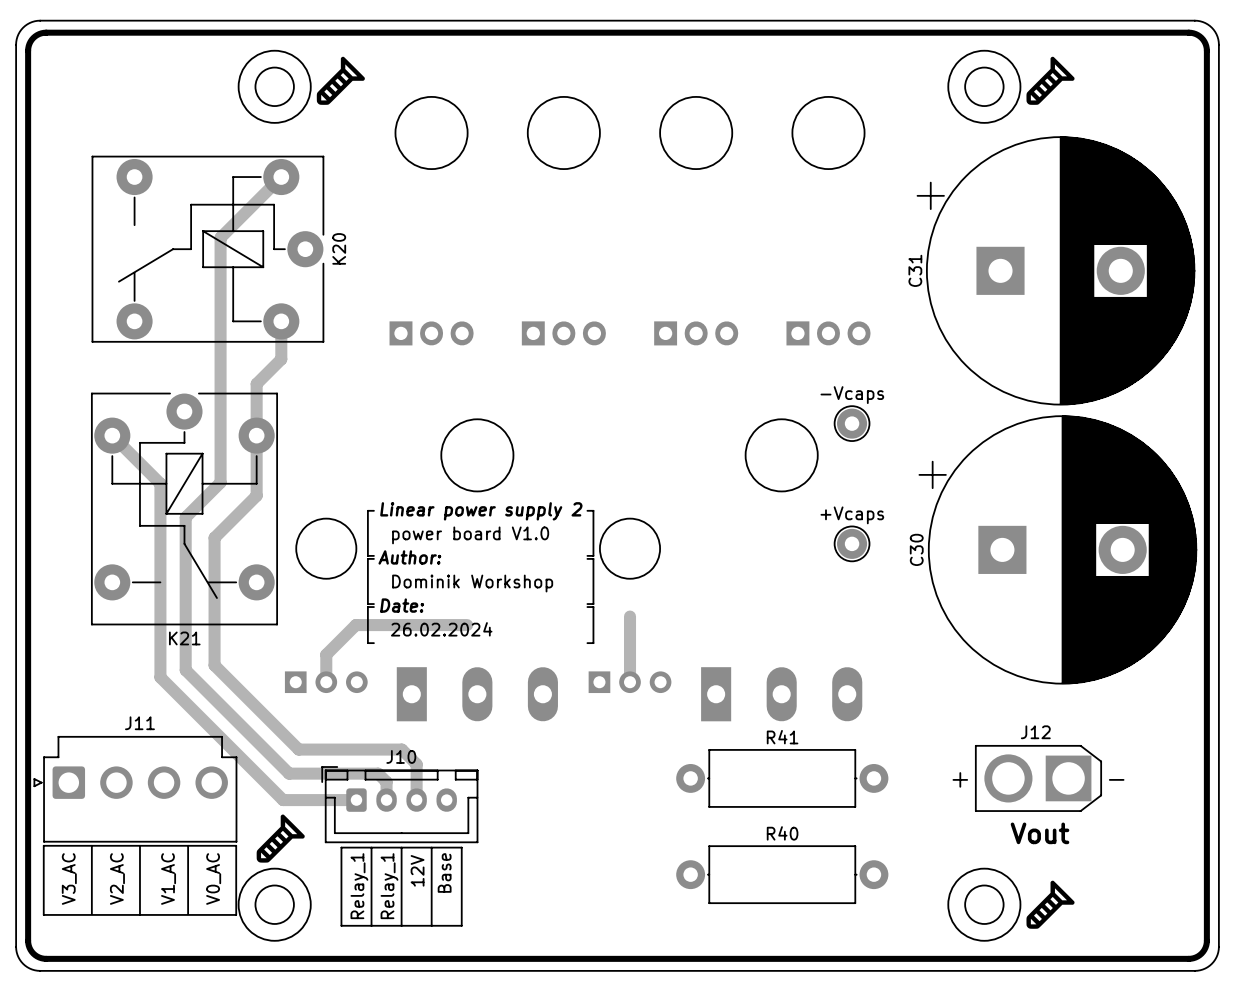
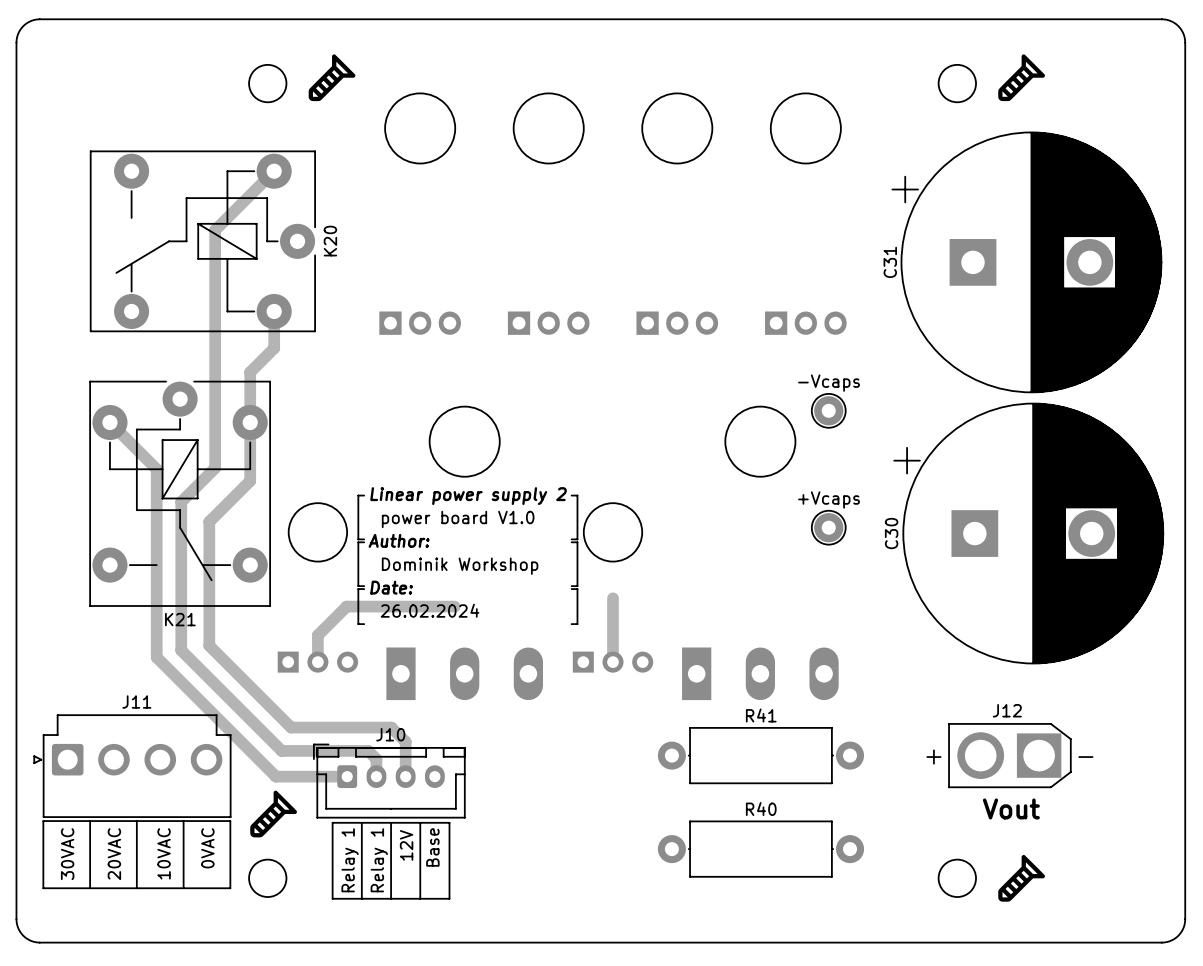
line: (46, 32) (1188, 32) (1199, 36) (1204, 41) (1206, 50) (1206, 940) (1203, 951) (1197, 956) (1188, 958) (46, 958) (35, 955) (30, 949) (28, 940) (28, 50) (33, 37) (46, 32) -> none
drawing: [237, 49, 312, 124] -> none
drawing: [947, 49, 1022, 124] -> none
drawing: [237, 867, 312, 942] -> none
drawing: [947, 867, 1022, 942] -> none
text: V3_AC (69, 879) -> 30VAC (67, 854)
text: V2_AC (117, 879) -> 20VAC (114, 854)
text: V1_AC (168, 879) -> 10VAC (164, 853)
text: V0_AC (213, 879) -> 0VAC (207, 848)
text: Relay_1 (359, 886) -> Relay 1 (350, 860)
text: Relay_1 (389, 886) -> Relay 1 (379, 860)

